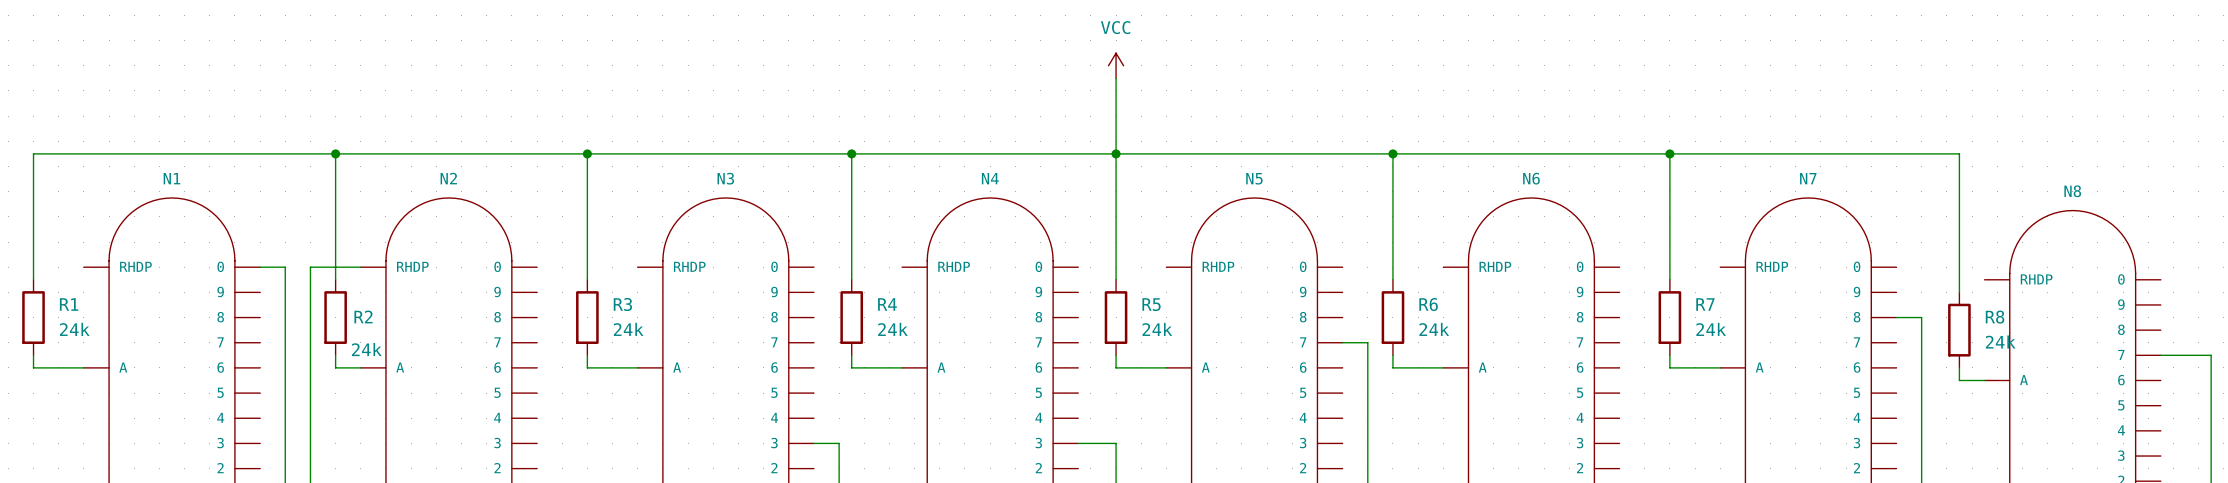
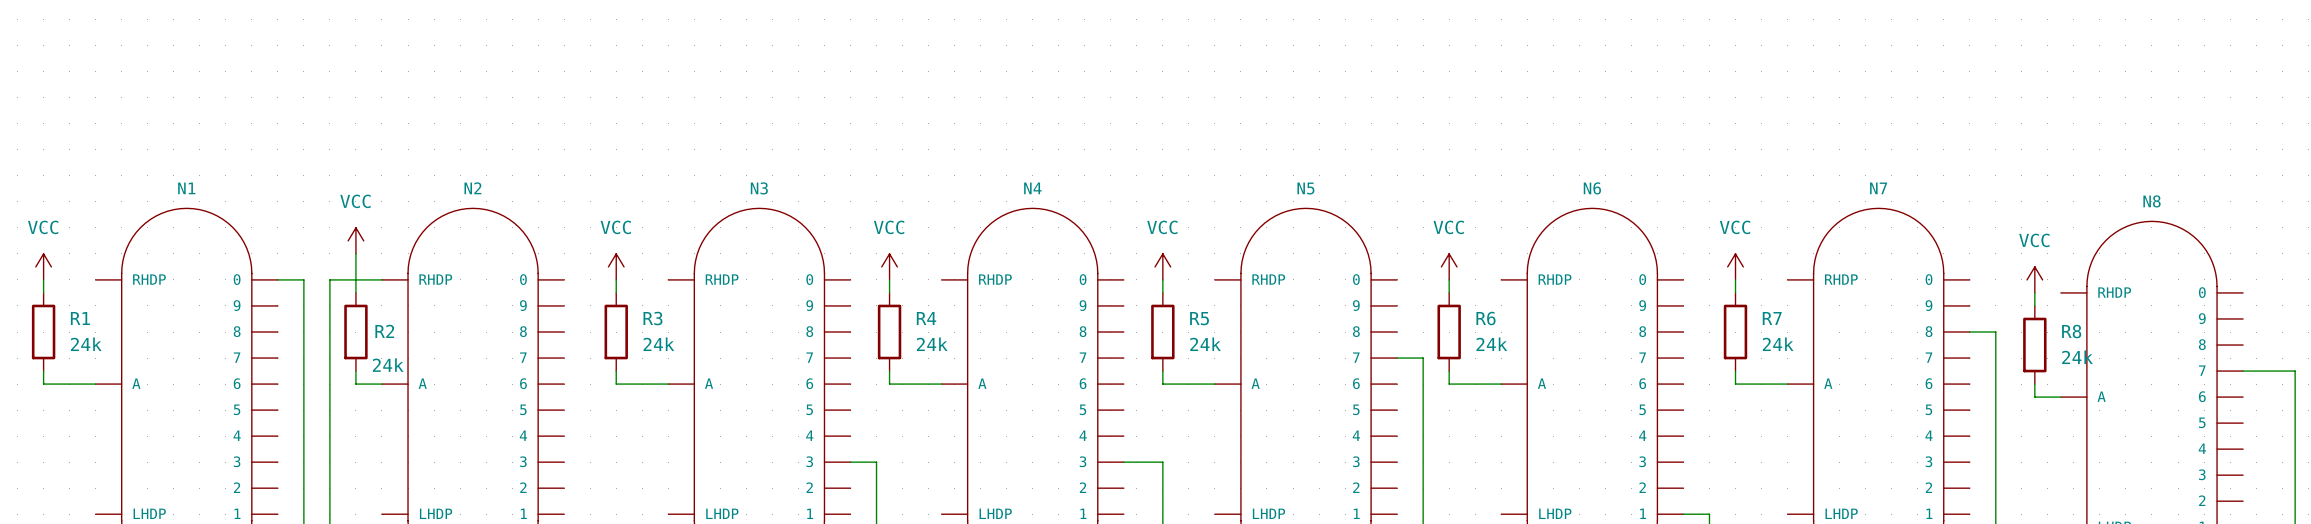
power symbol: VCC (1116, 65) -> none
wire: (1116, 78) (1116, 267) -> none
wire: (335, 153) (335, 242) -> none
junction: (335, 153) -> none
wire: (587, 153) (587, 267) -> none
junction: (587, 153) -> none
wire: (851, 153) (851, 267) -> none
junction: (851, 153) -> none
junction: (1116, 153) -> none
wire: (1392, 153) (1392, 267) -> none
junction: (1392, 153) -> none
wire: (1669, 153) (1669, 267) -> none
junction: (1669, 153) -> none
power symbol: none -> VCC (355, 240)
power symbol: none -> VCC (43, 266)
power symbol: none -> VCC (616, 266)
power symbol: none -> VCC (889, 266)
power symbol: none -> VCC (1162, 266)
power symbol: none -> VCC (1449, 266)
power symbol: none -> VCC (1735, 266)
wire: (33, 267) (33, 153) (1959, 153) (1959, 279) -> none
power symbol: none -> VCC (2034, 279)

